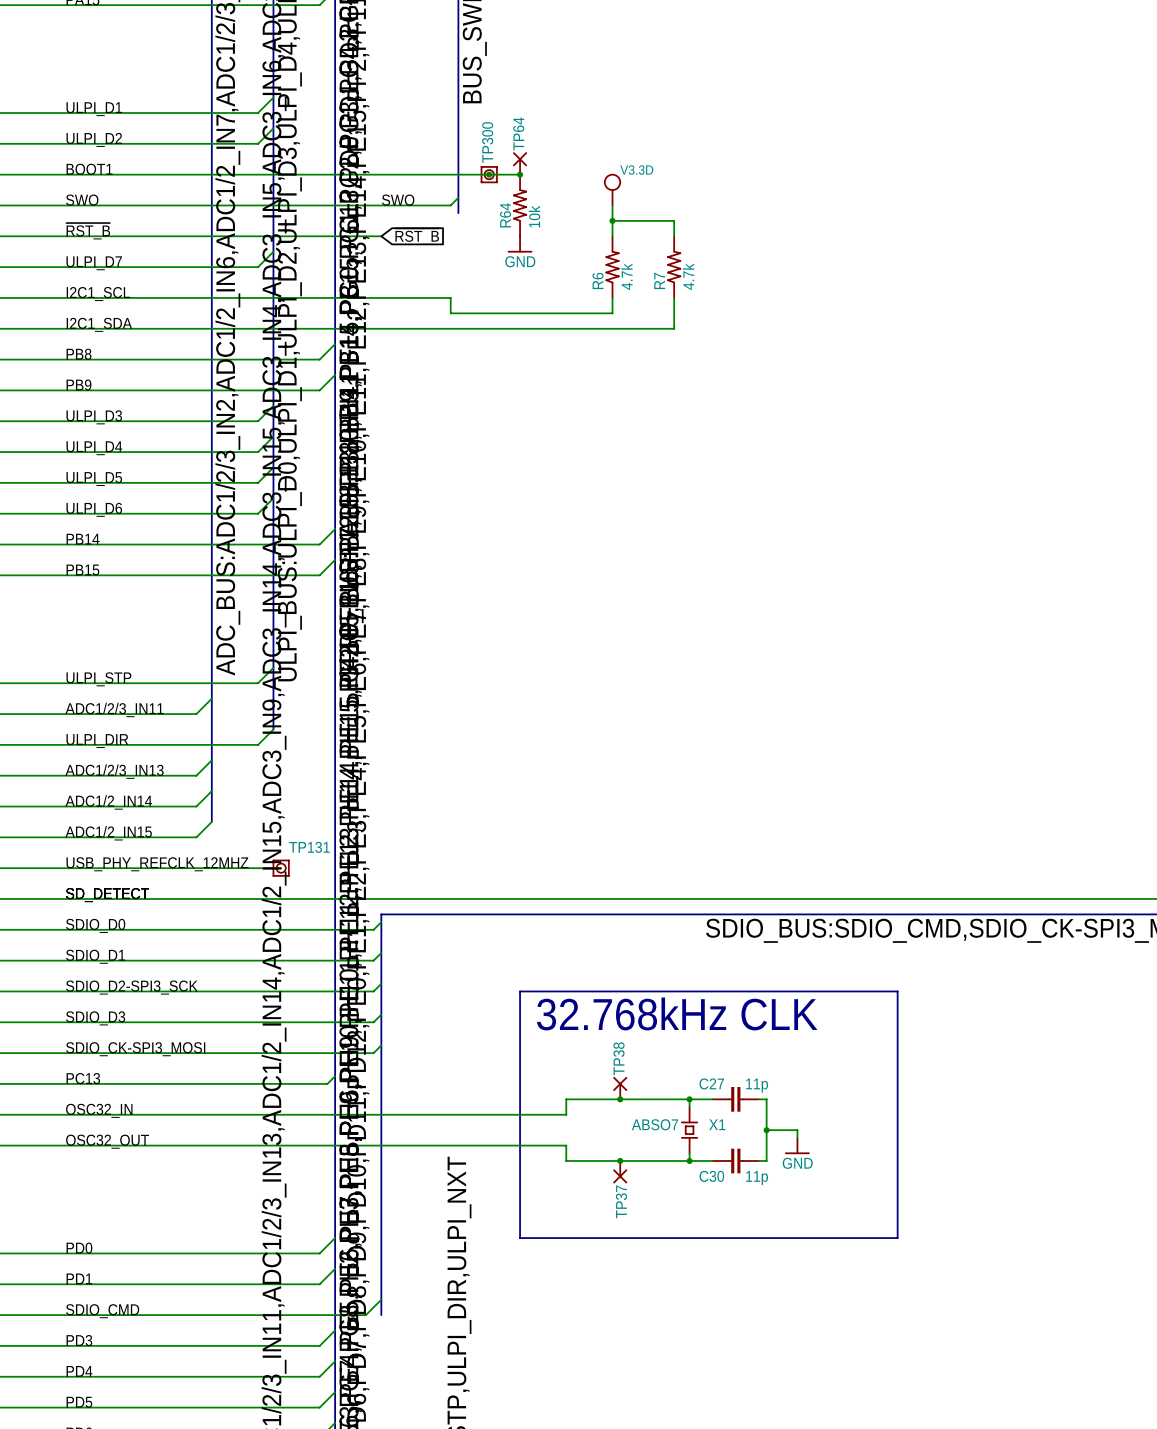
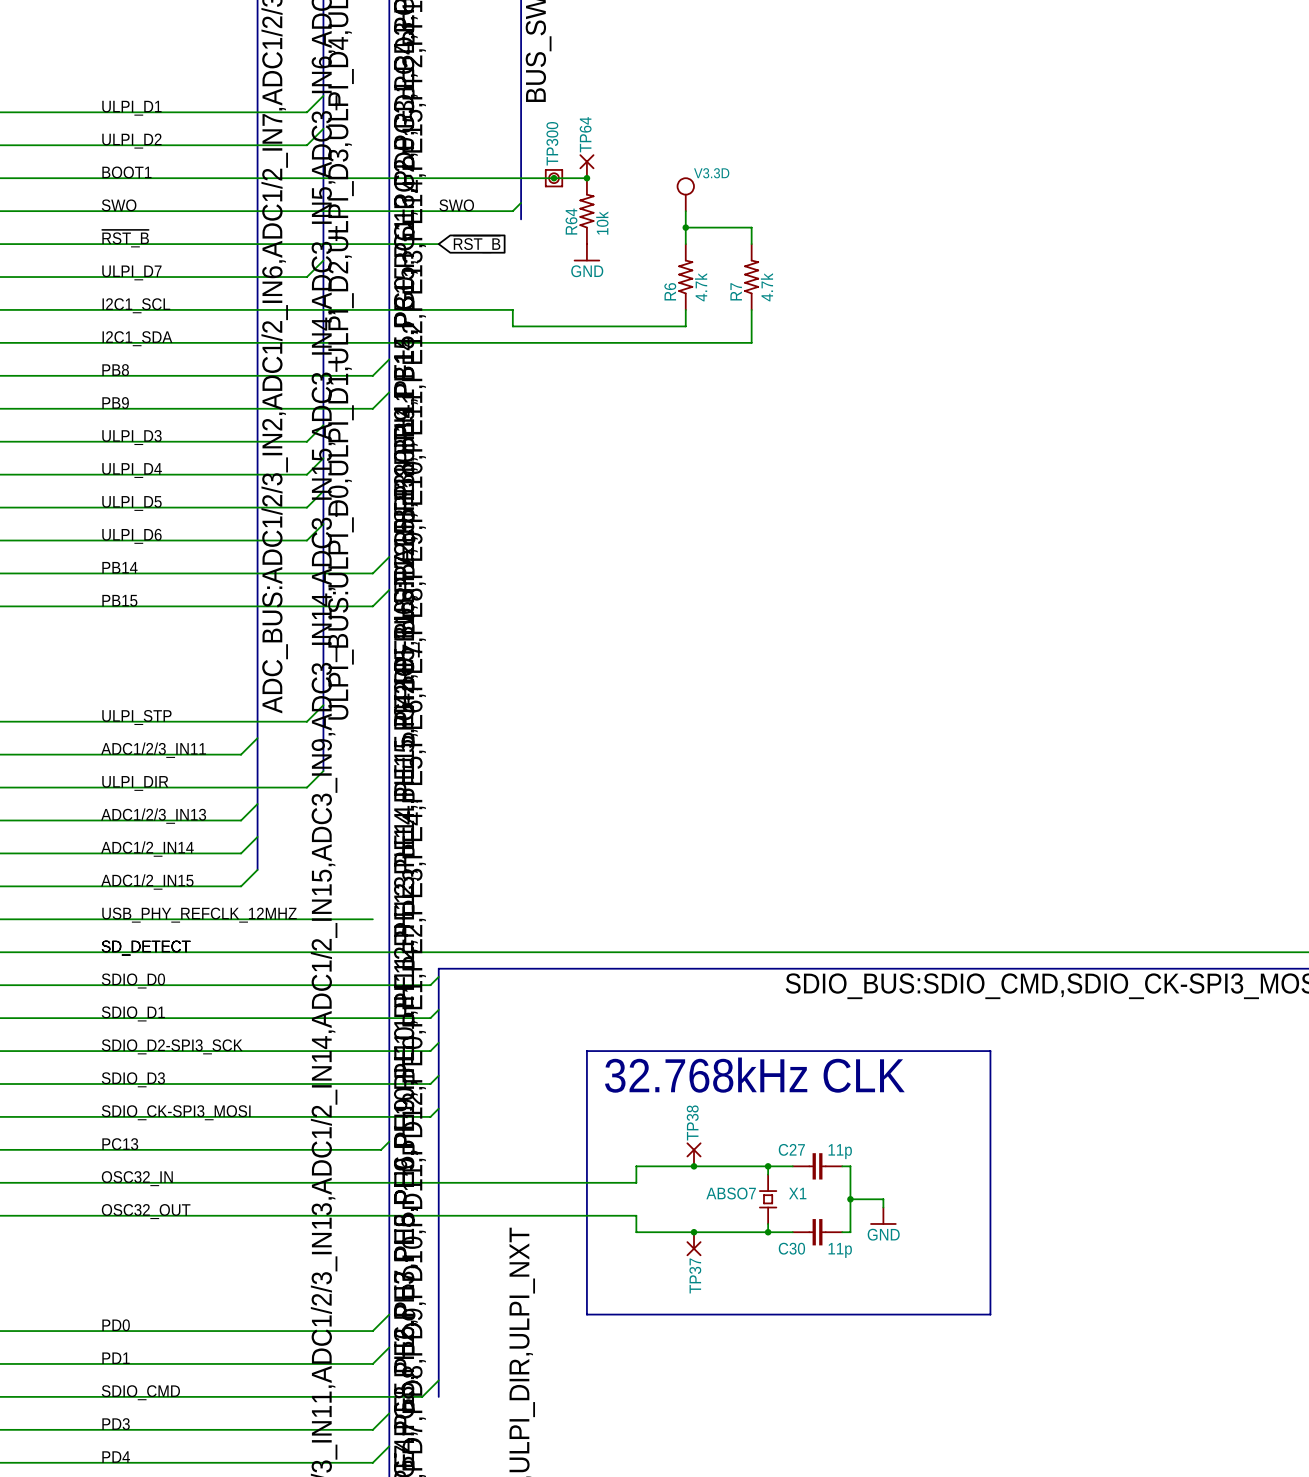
wire: none -> (331, 919) (372, 919)
TP131: (281, 868) -> none

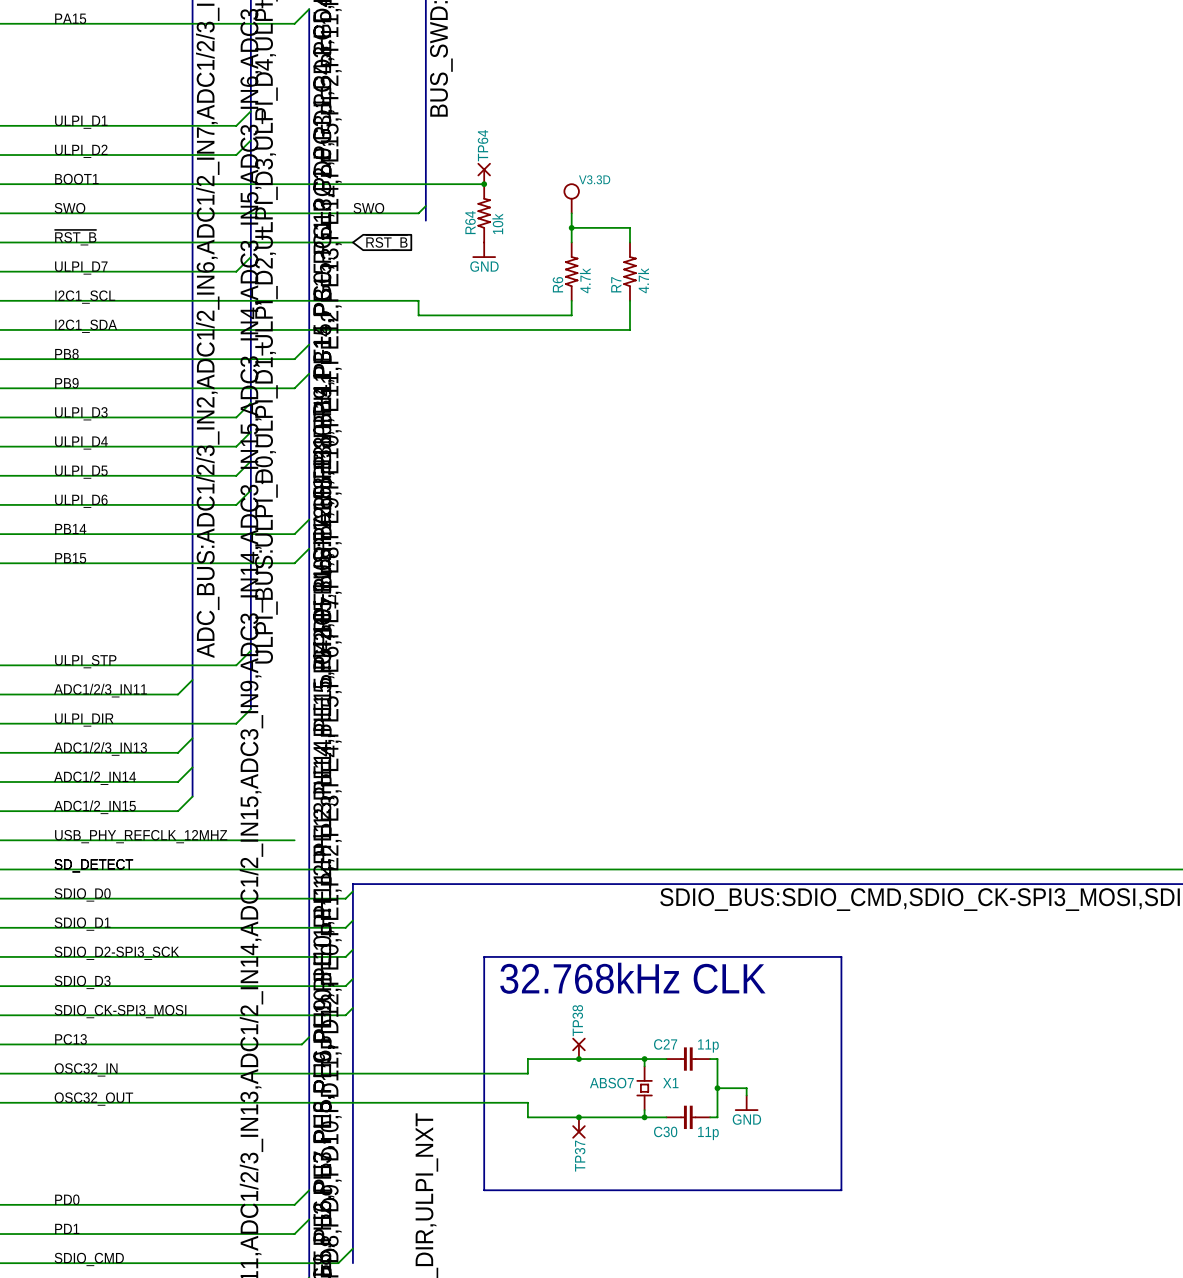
TP300: (554, 178) -> none
junction: (554, 178) -> none

